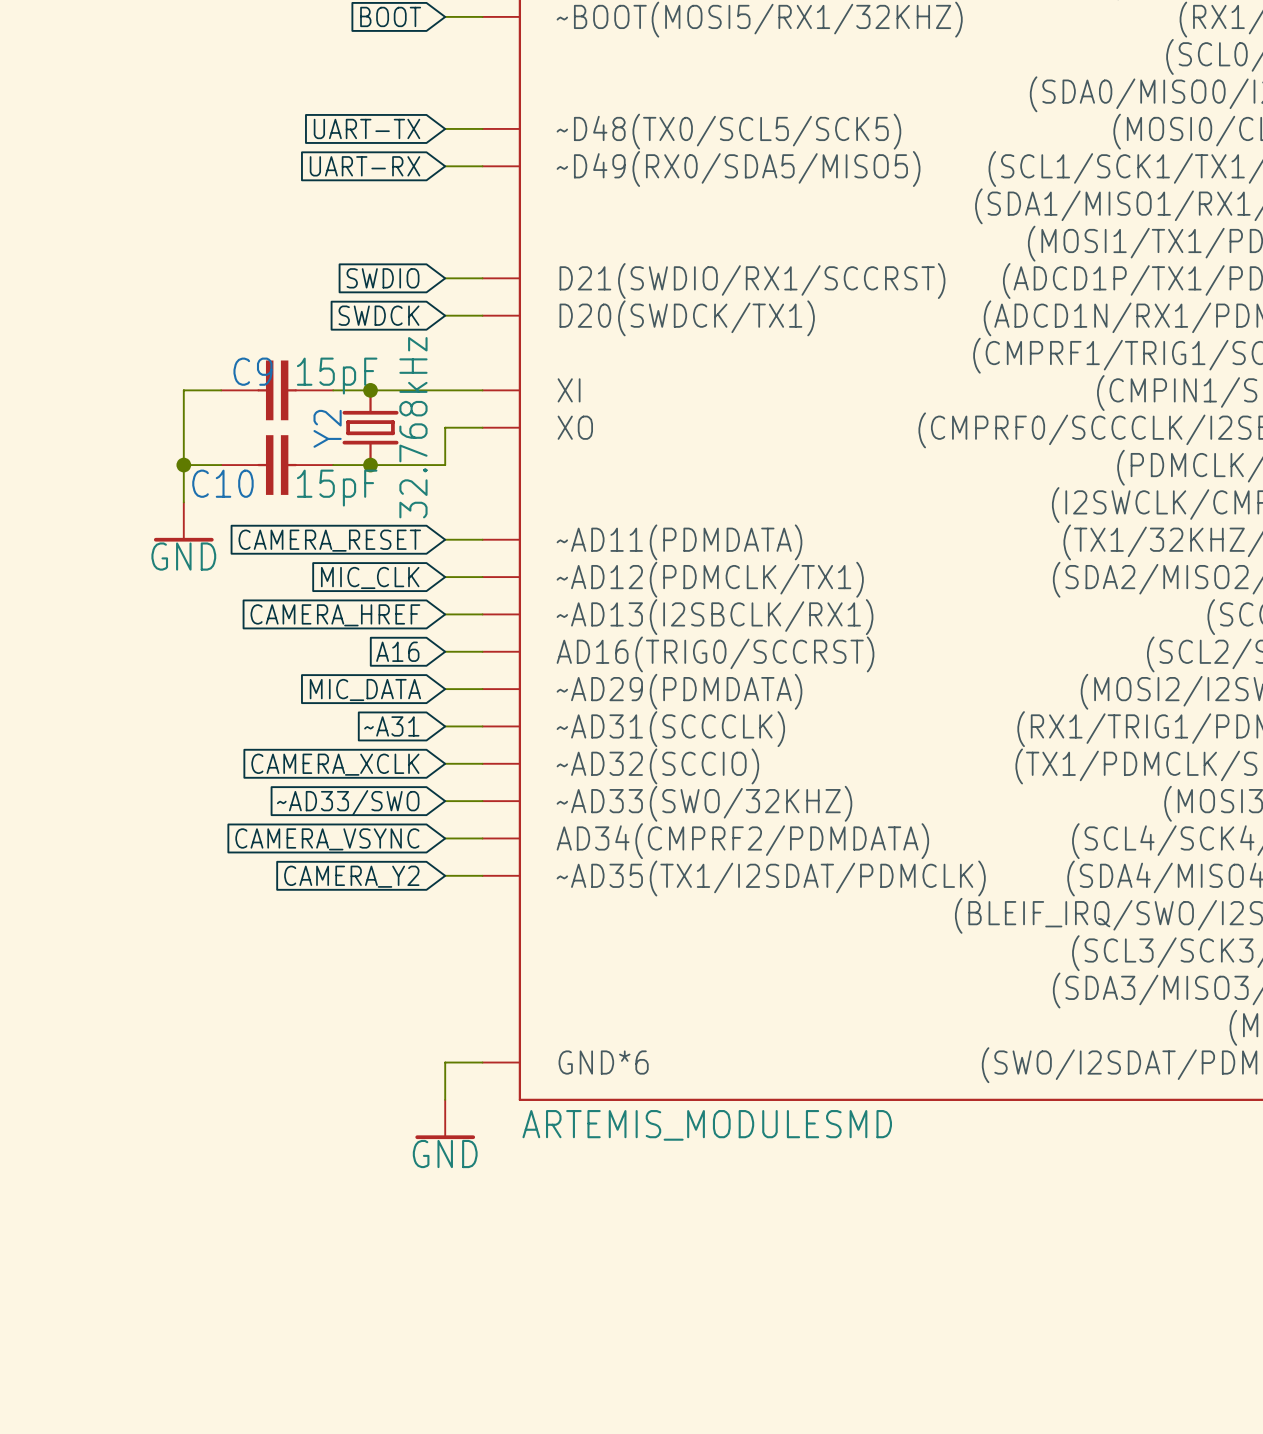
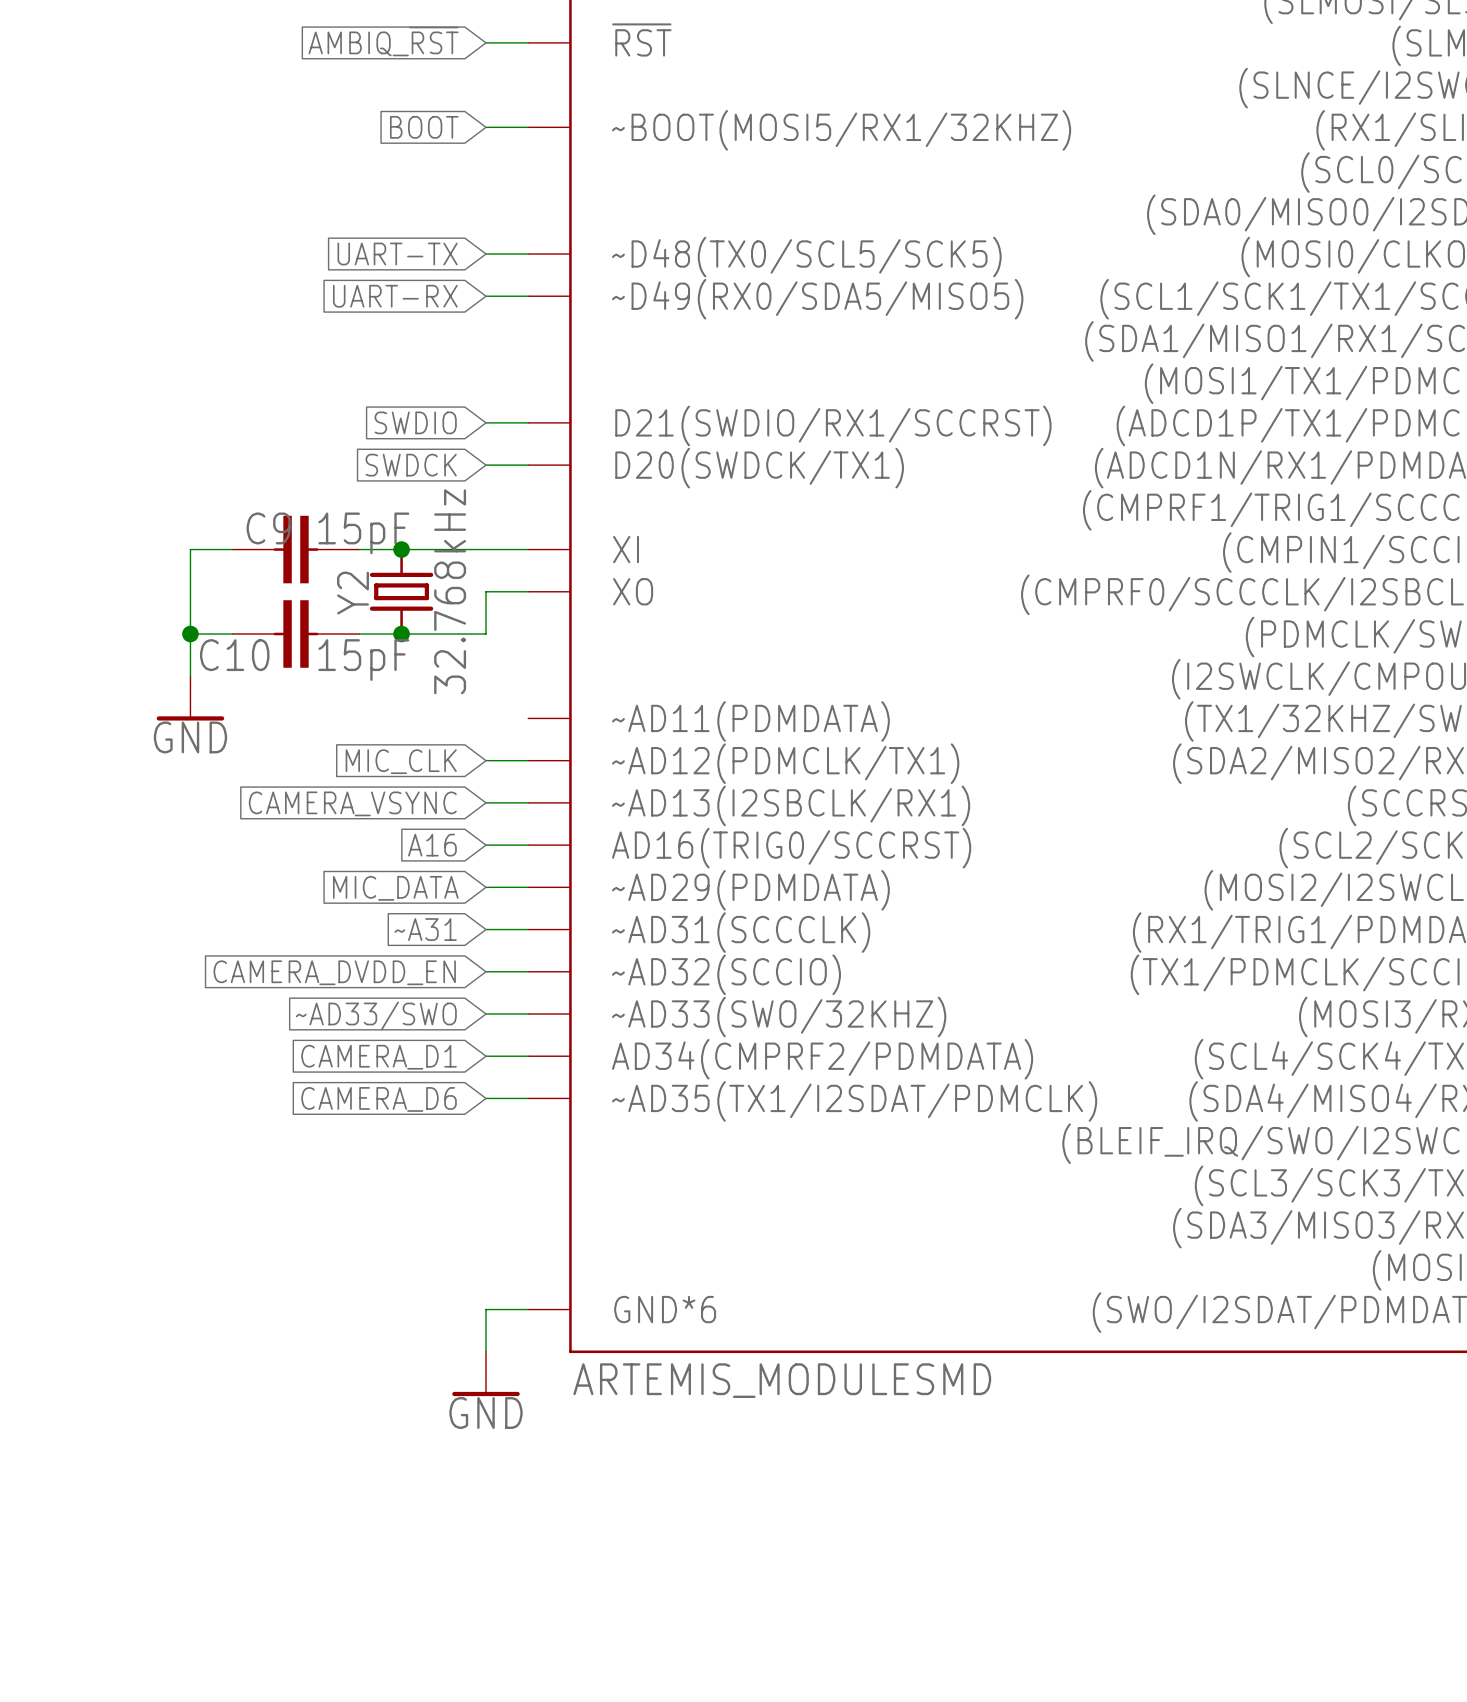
wire: (445, 539) (482, 539) -> none
global label: CAMERA_RESET (329, 540) -> none
global label: CAMERA_HREF (335, 615) -> CAMERA_VSYNC (352, 803)
global label: CAMERA_XCLK (335, 764) -> CAMERA_DVDD_EN (334, 972)
global label: CAMERA_VSYNC (327, 839) -> CAMERA_D1 (379, 1057)
global label: CAMERA_Y2 (351, 876) -> CAMERA_D6 (379, 1099)

